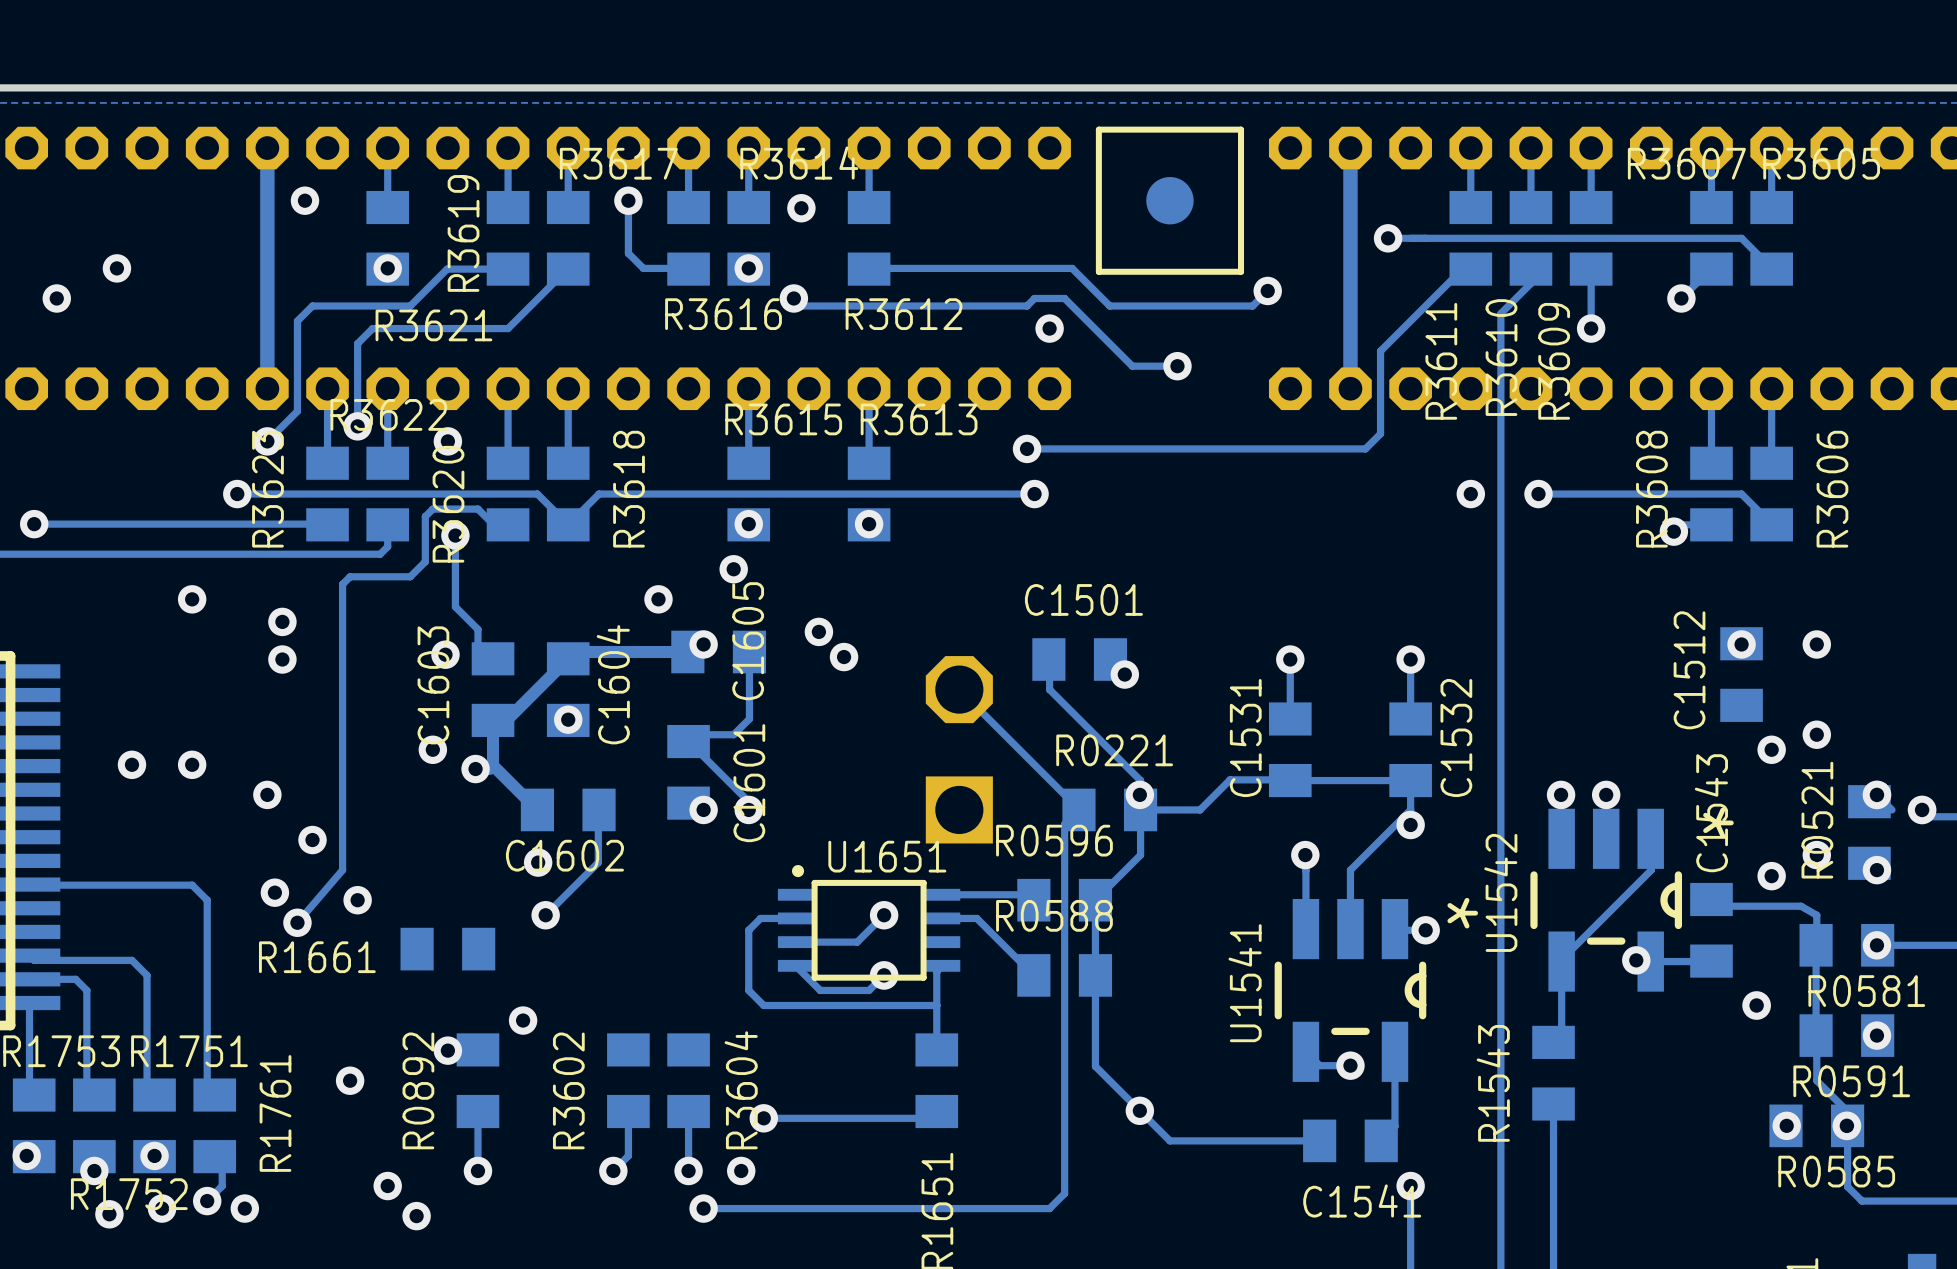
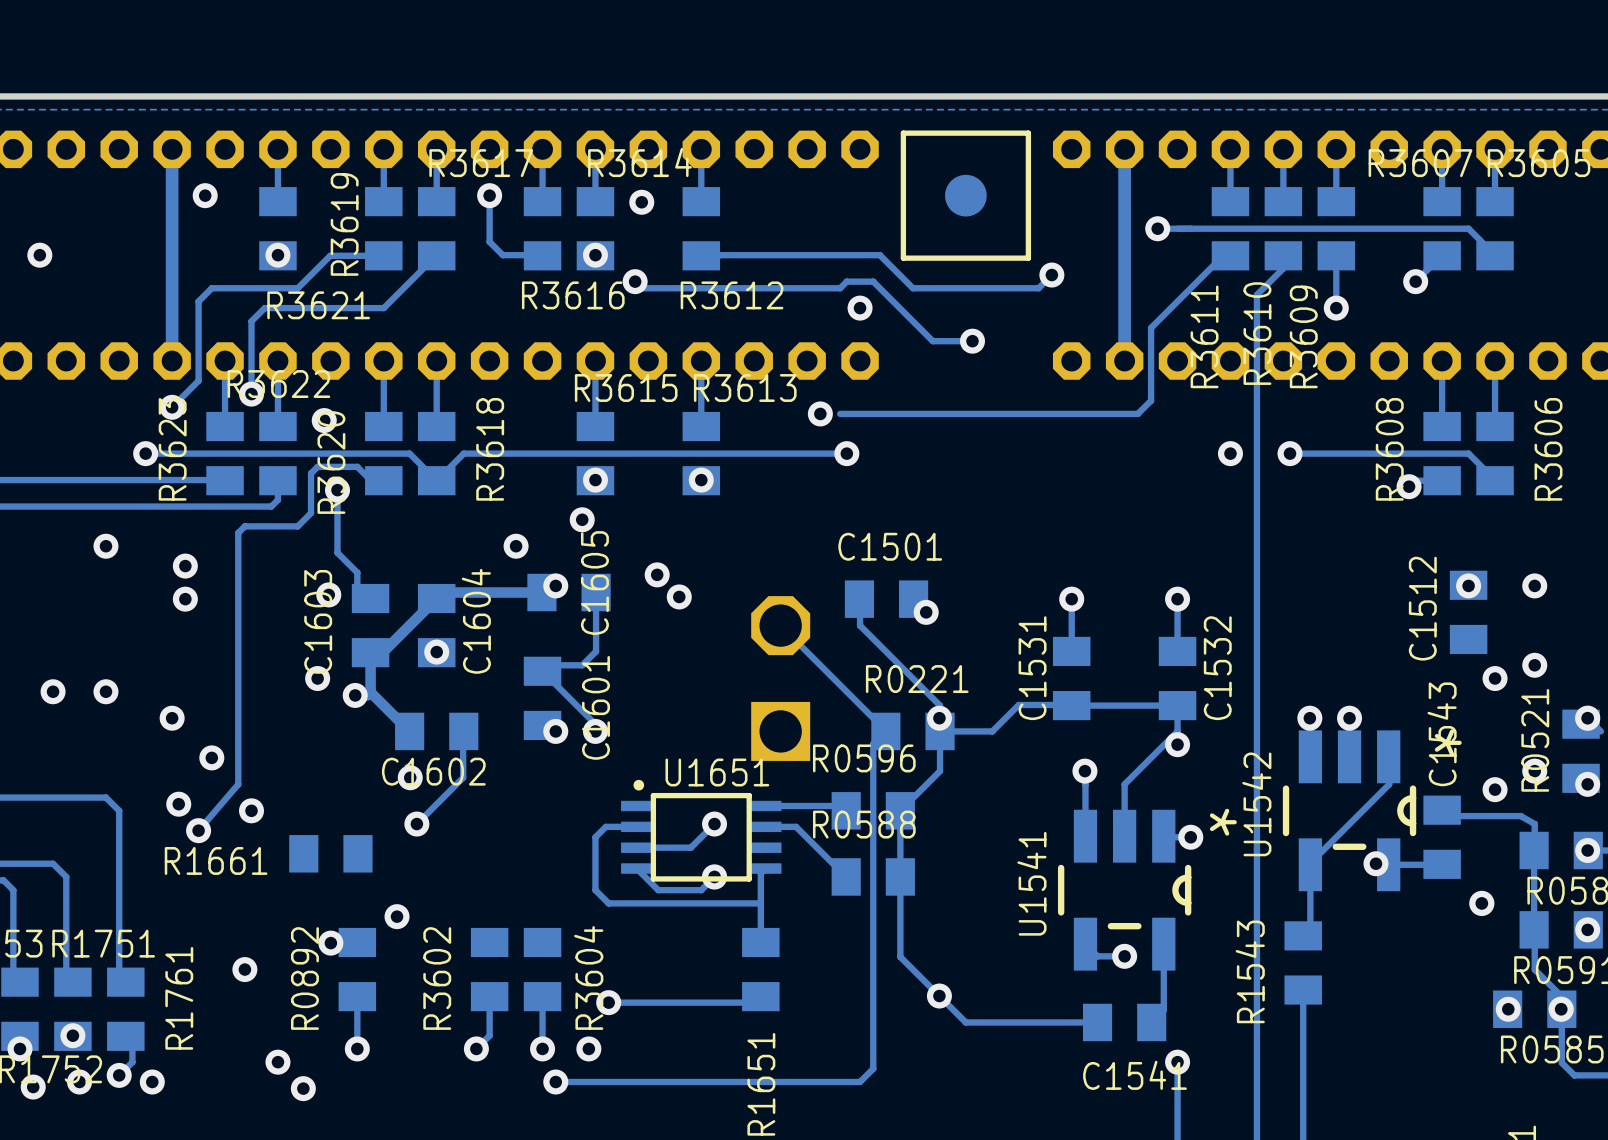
via position: (447, 441) -> (324, 420)
via position: (1027, 448) -> (820, 413)

